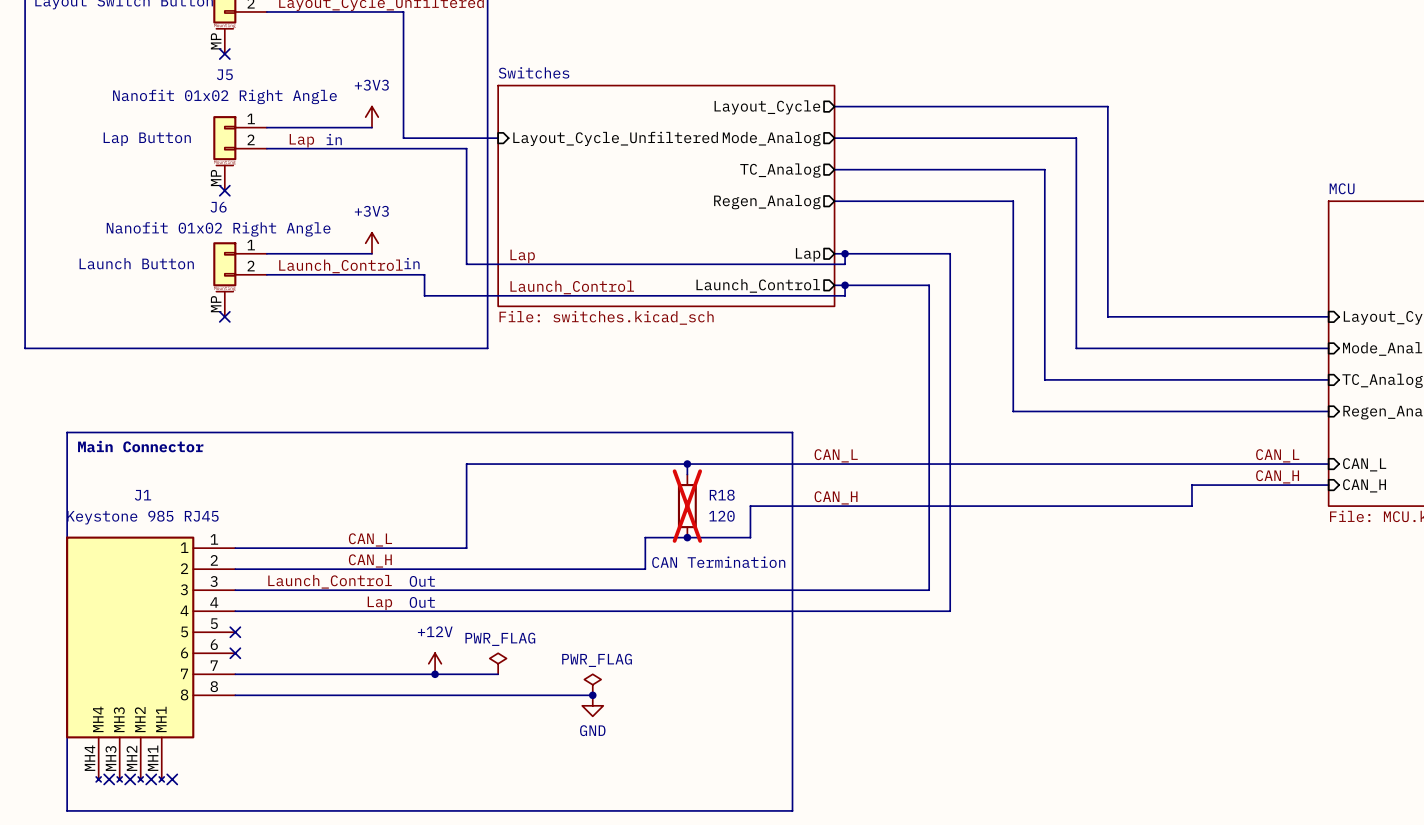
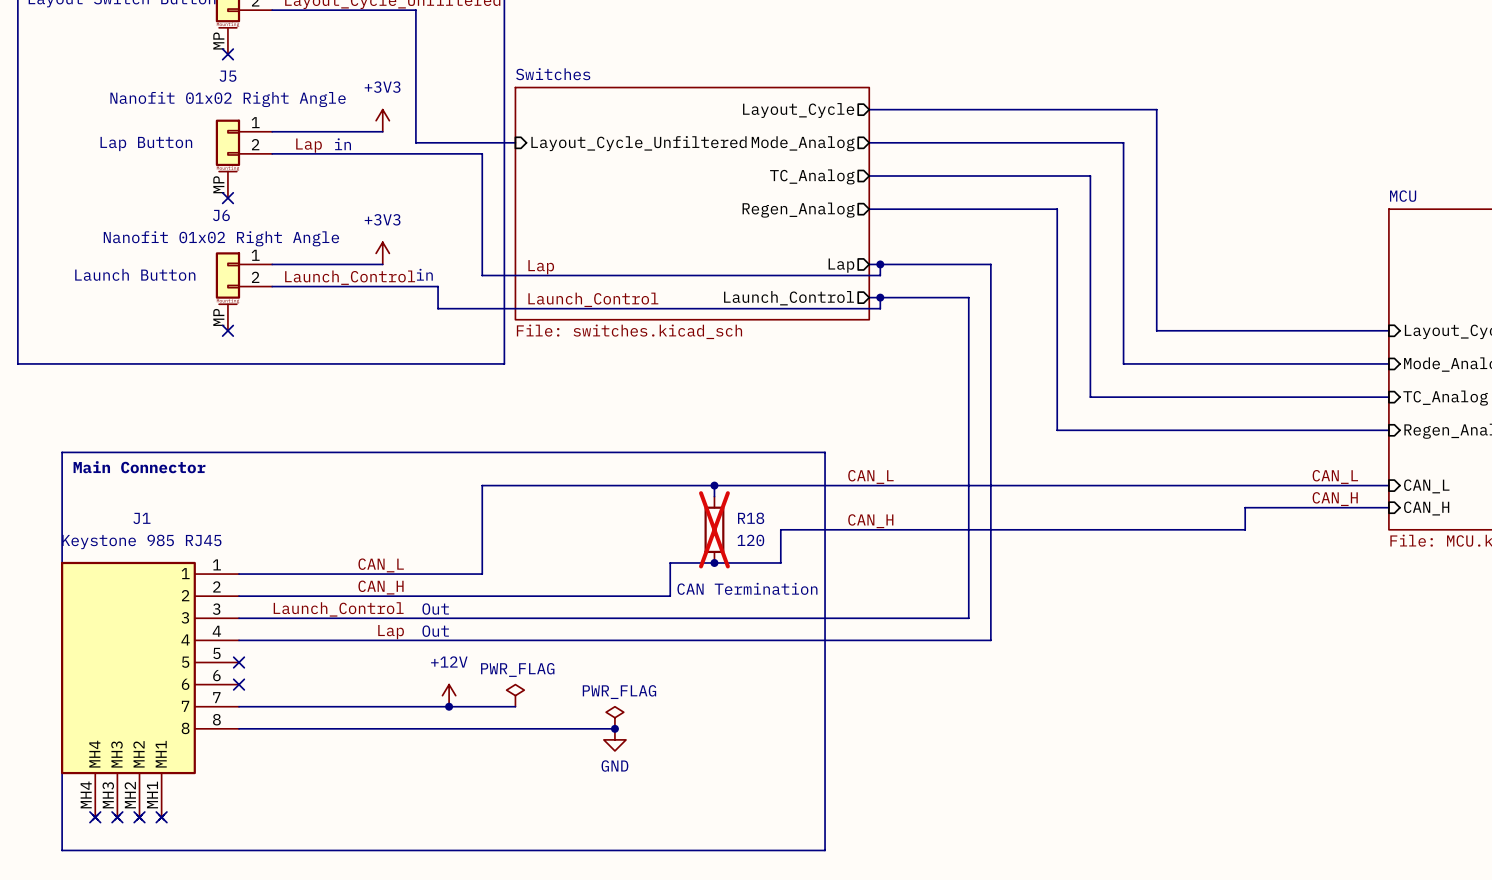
no-connect mark: none -> (95, 817)
no-connect mark: (109, 779) -> none
no-connect mark: none -> (117, 817)
no-connect mark: (130, 779) -> none
no-connect mark: none -> (139, 817)
no-connect mark: (151, 779) -> none
no-connect mark: none -> (161, 817)
no-connect mark: (172, 779) -> none

